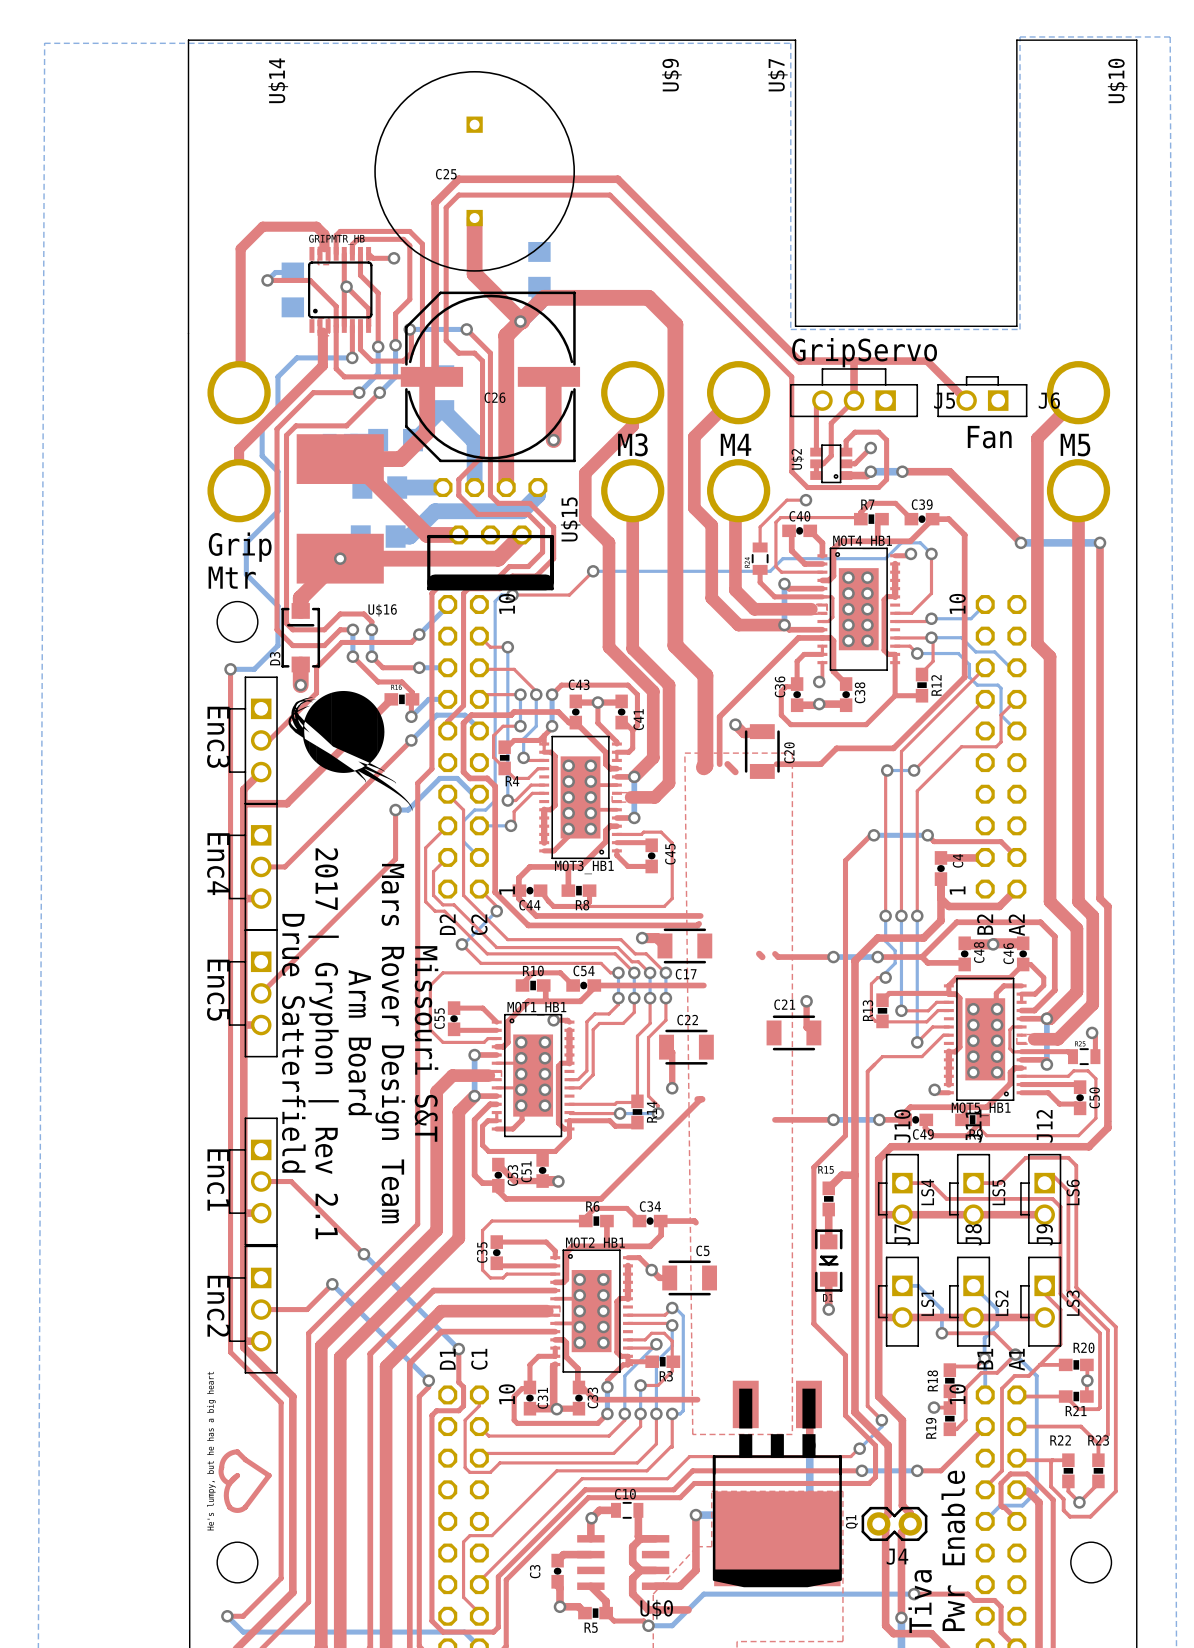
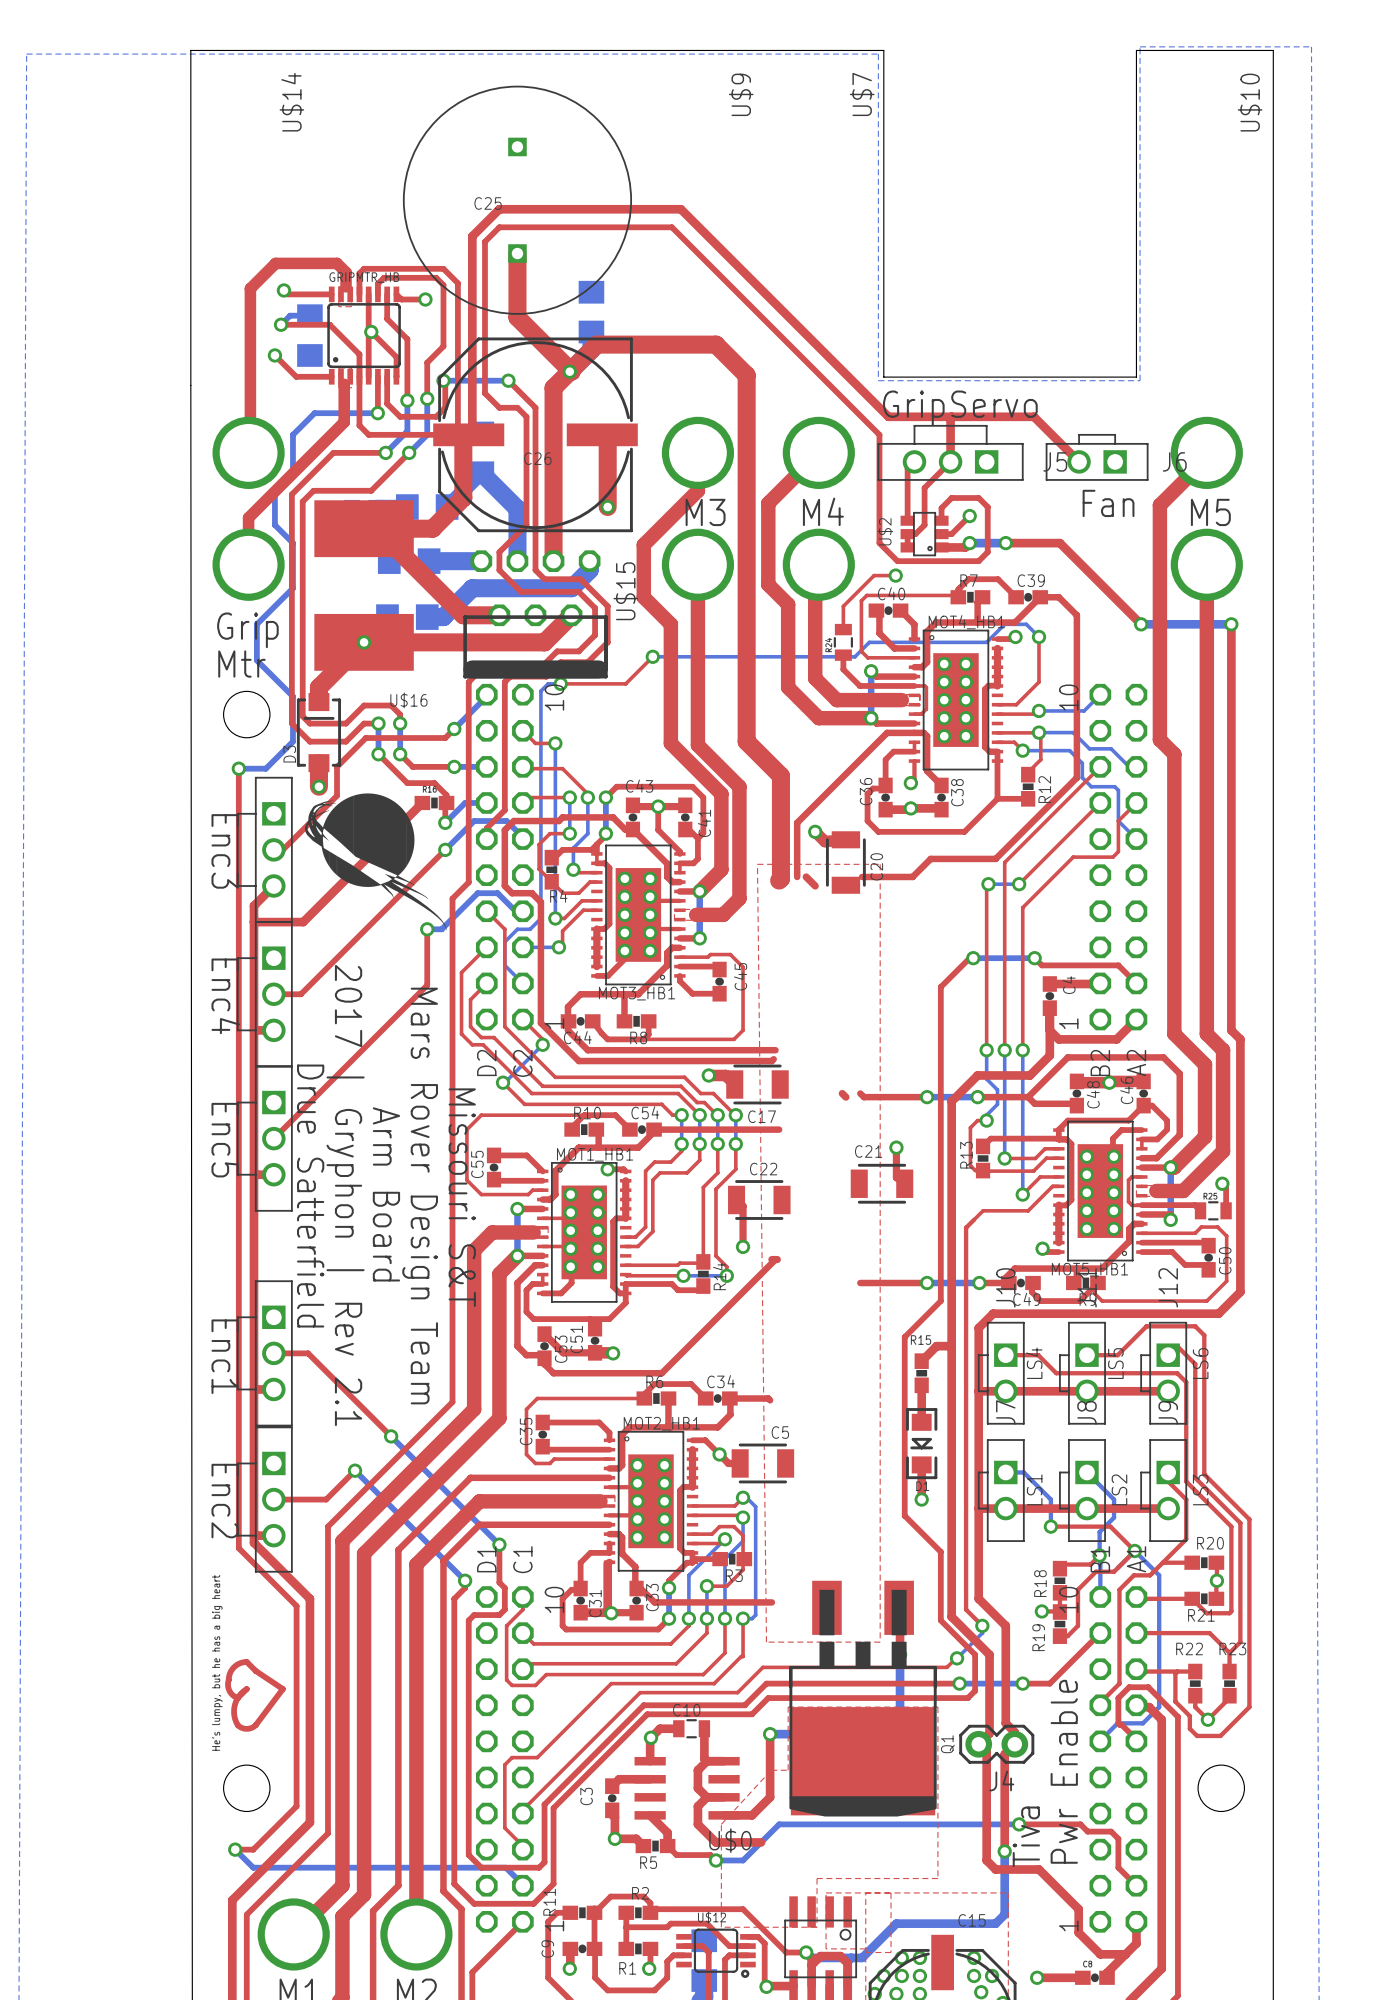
top track: none -> (283, 290) (287, 294) (331, 294)
via: none -> (283, 290)
top track: none -> (274, 355) (296, 376) (331, 376)
via: none -> (274, 355)

